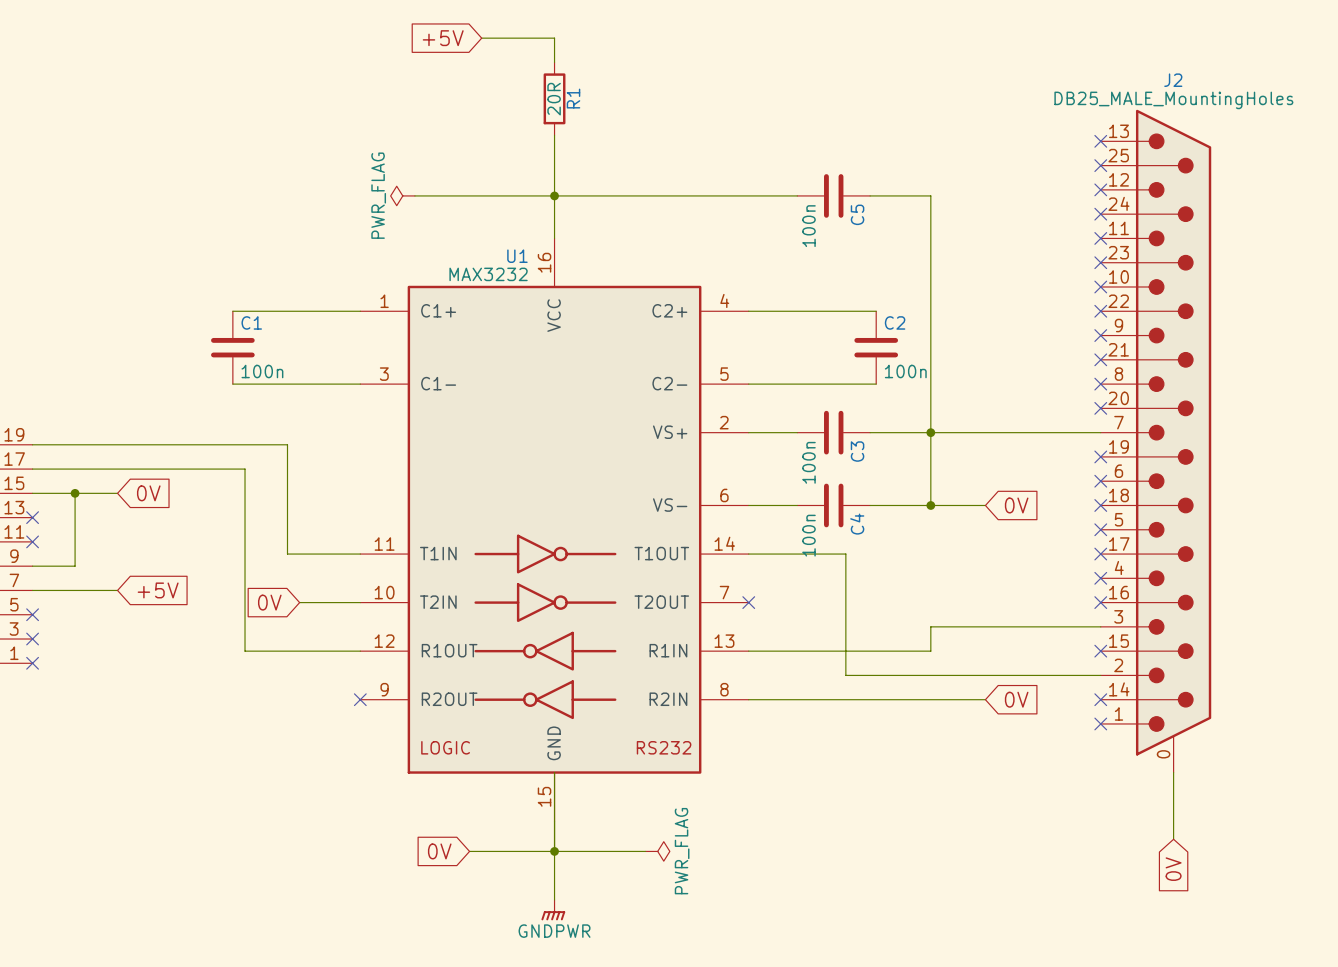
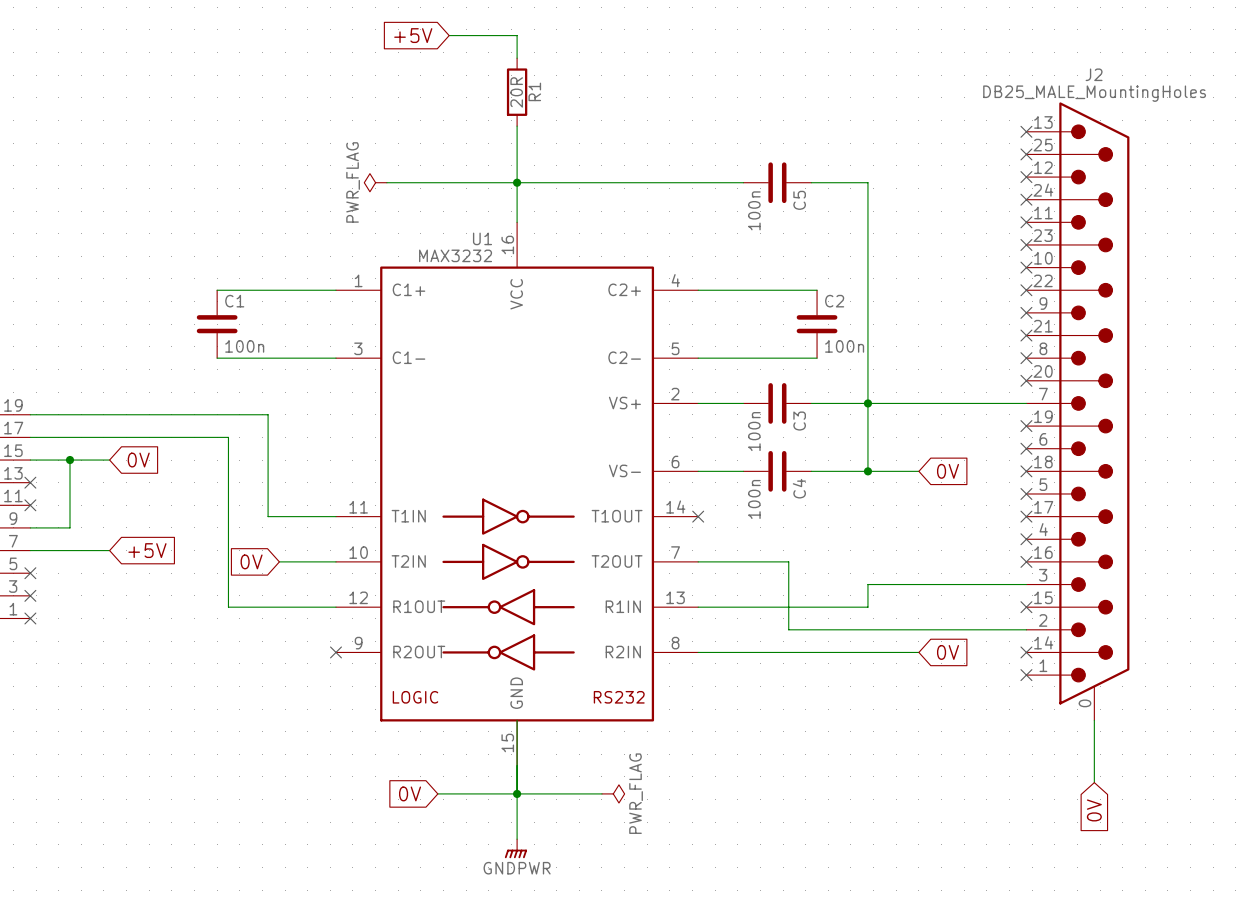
wire: (748, 554) (845, 554) (845, 602) -> (698, 561) (788, 561)
no-connect mark position: (748, 602) -> (698, 516)

